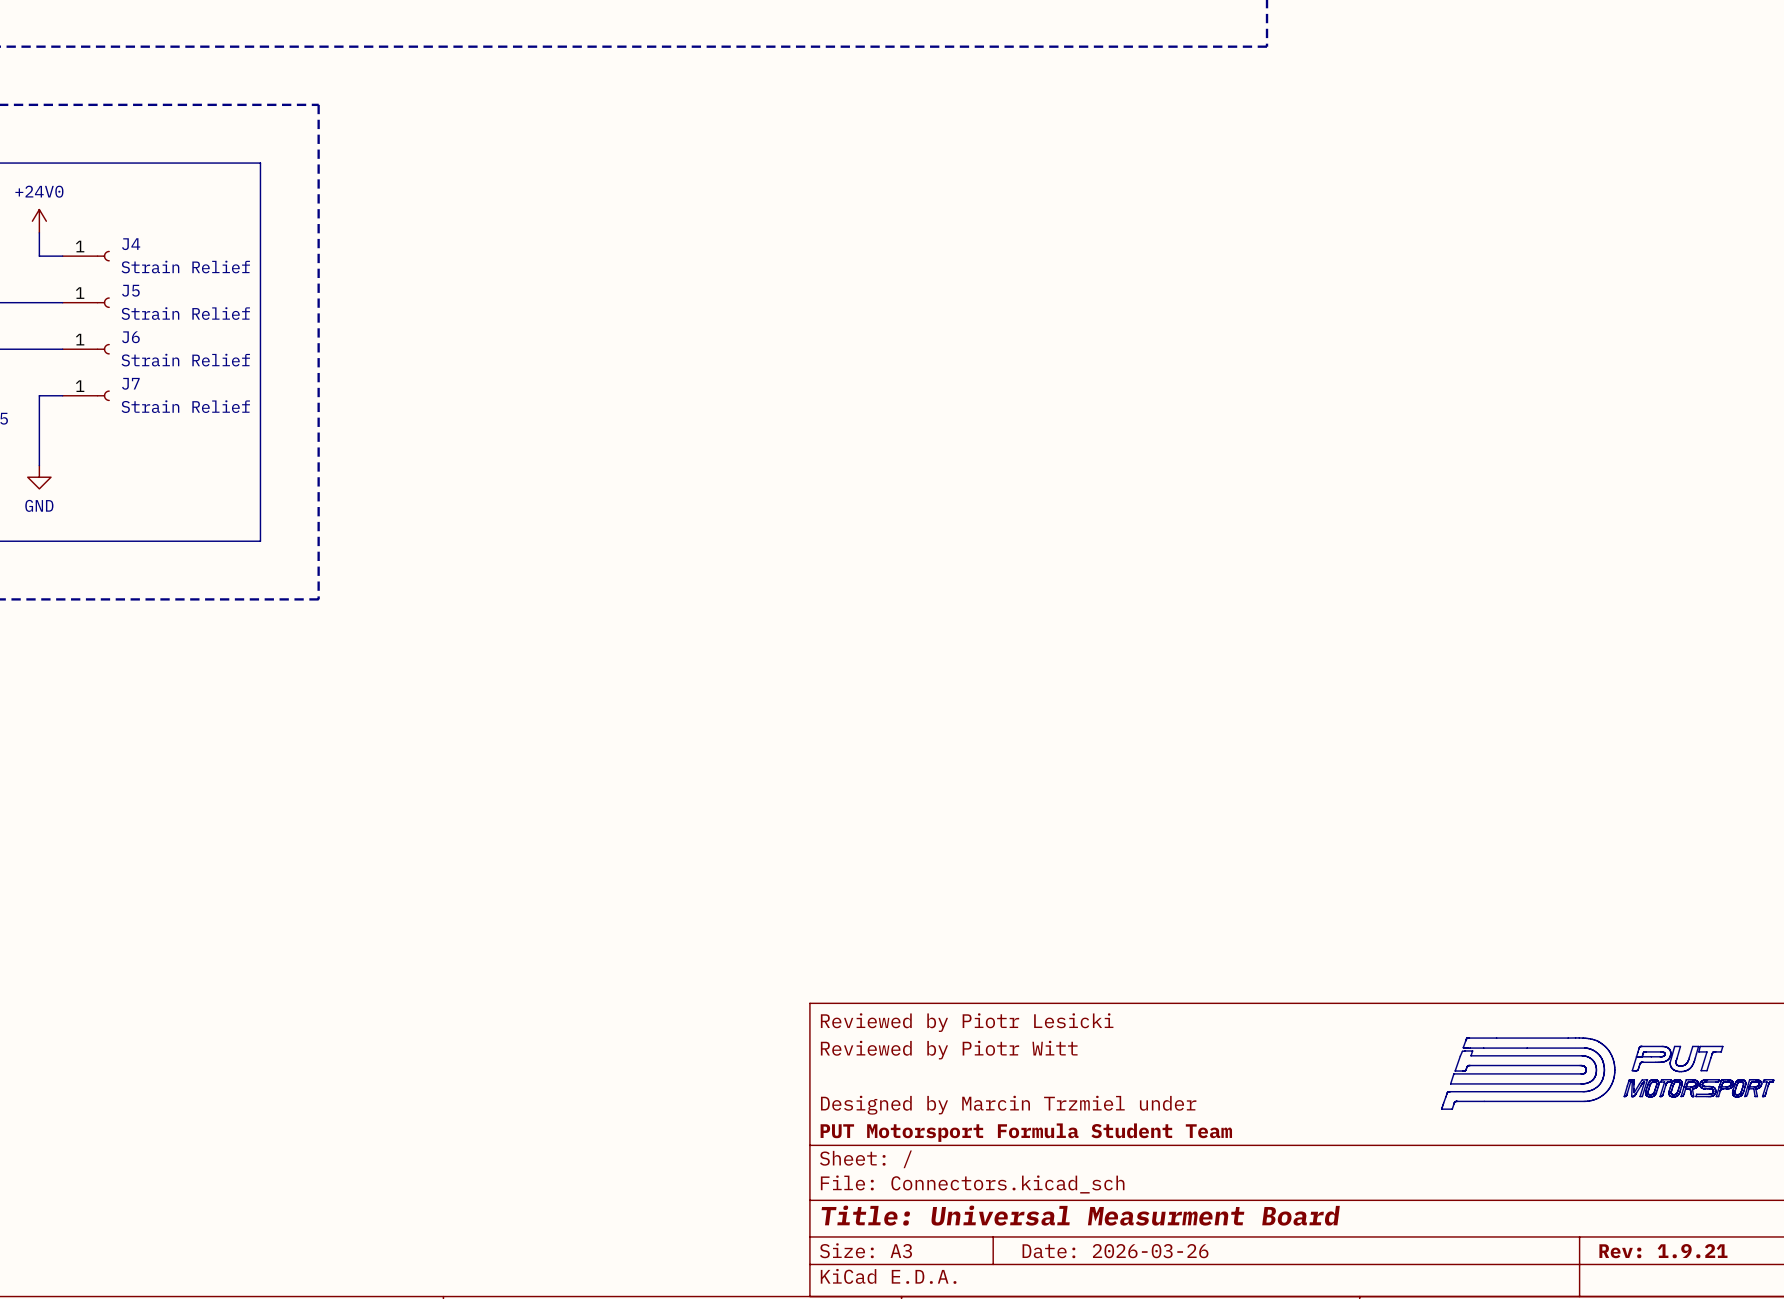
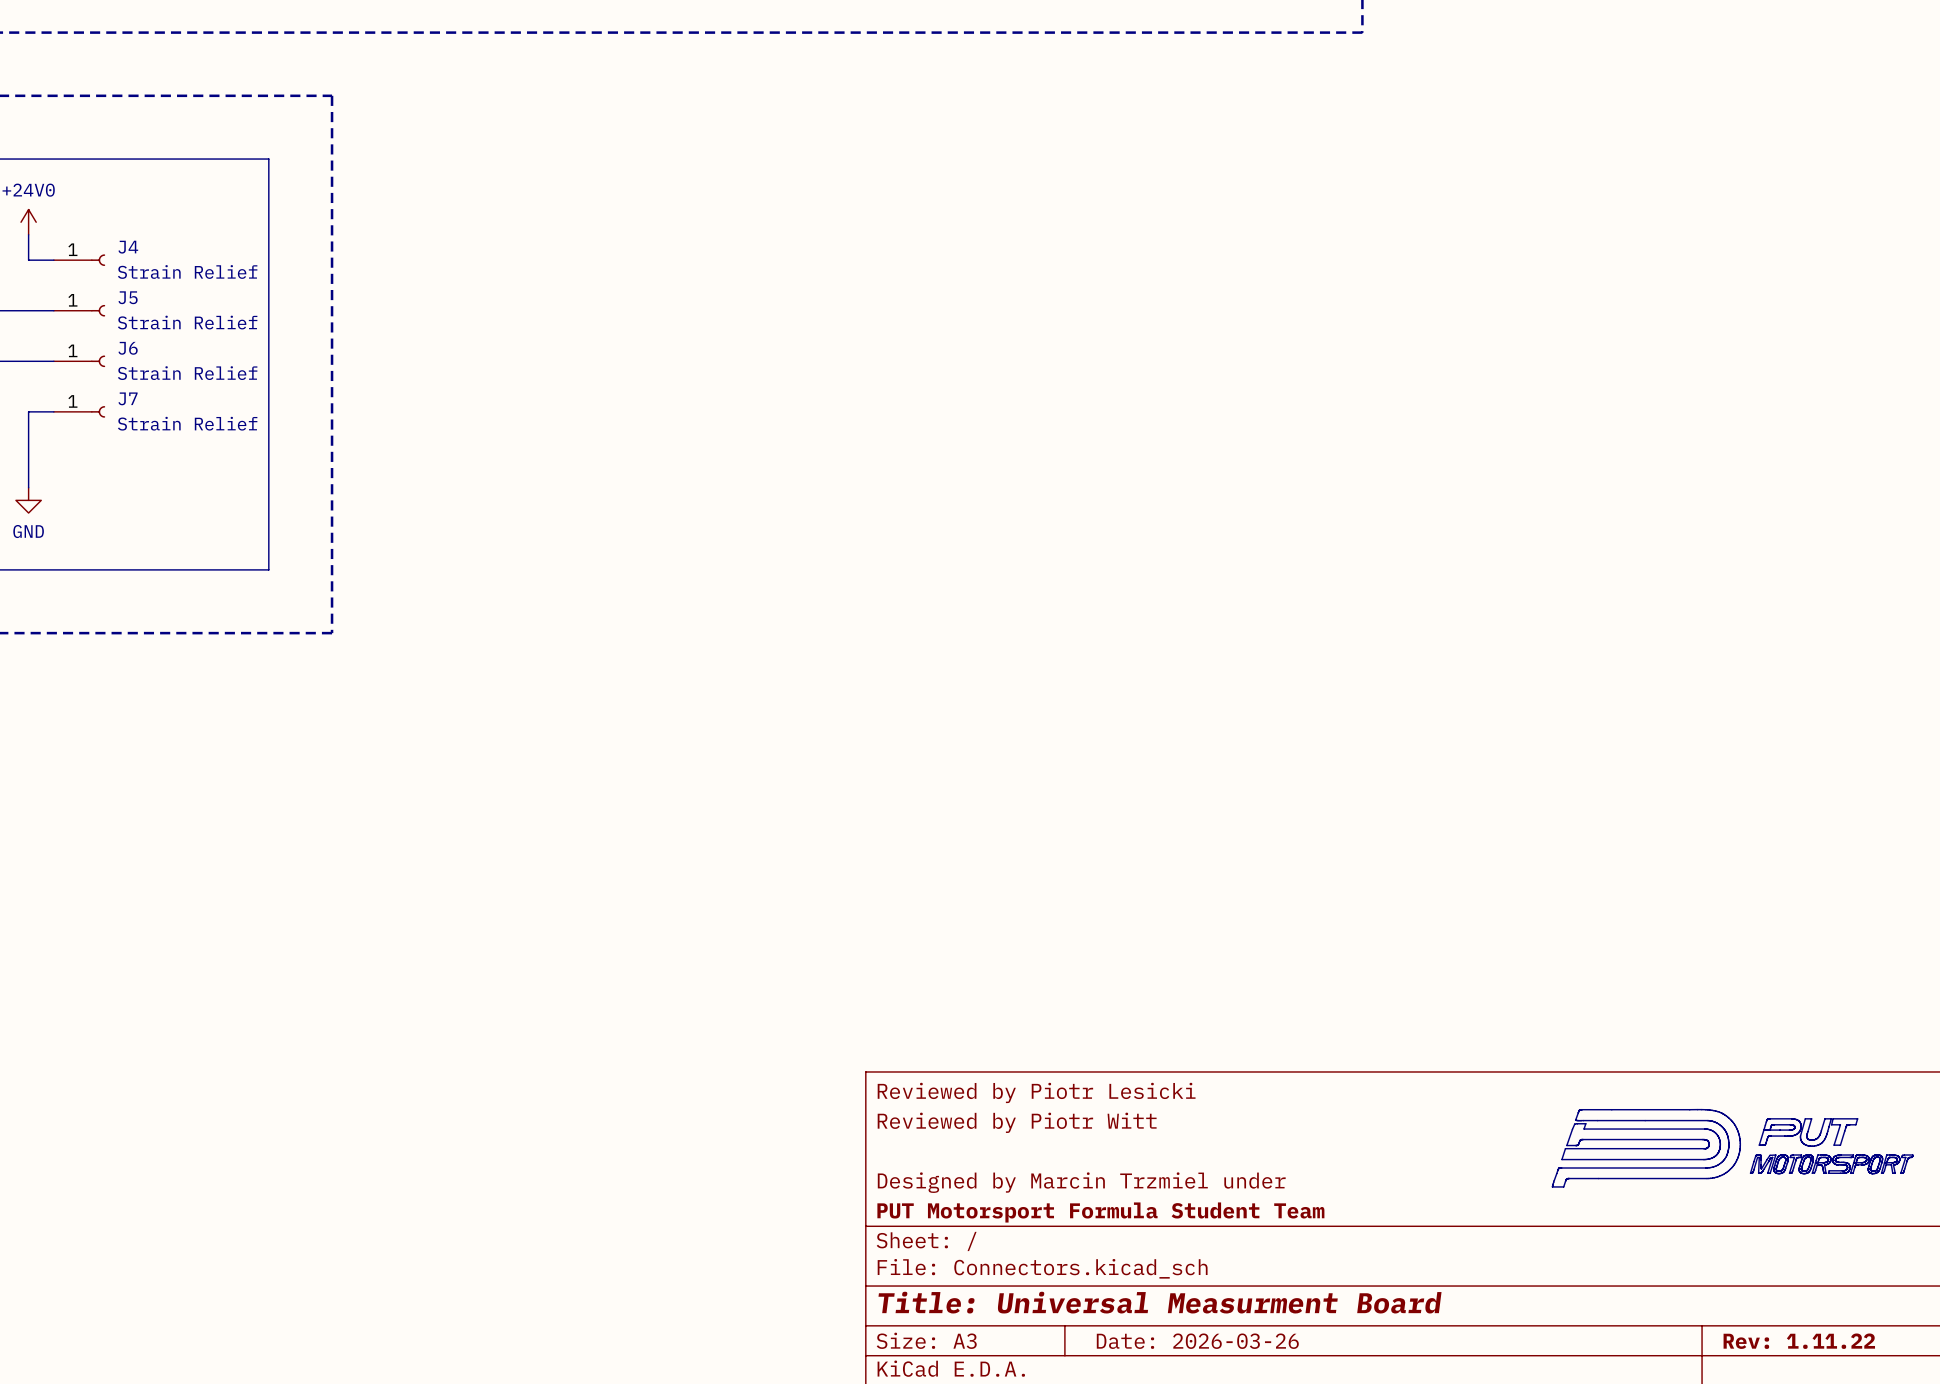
title block: Rev: 1.9.21 (1663, 1251) -> Rev: 1.11.22 (1799, 1341)

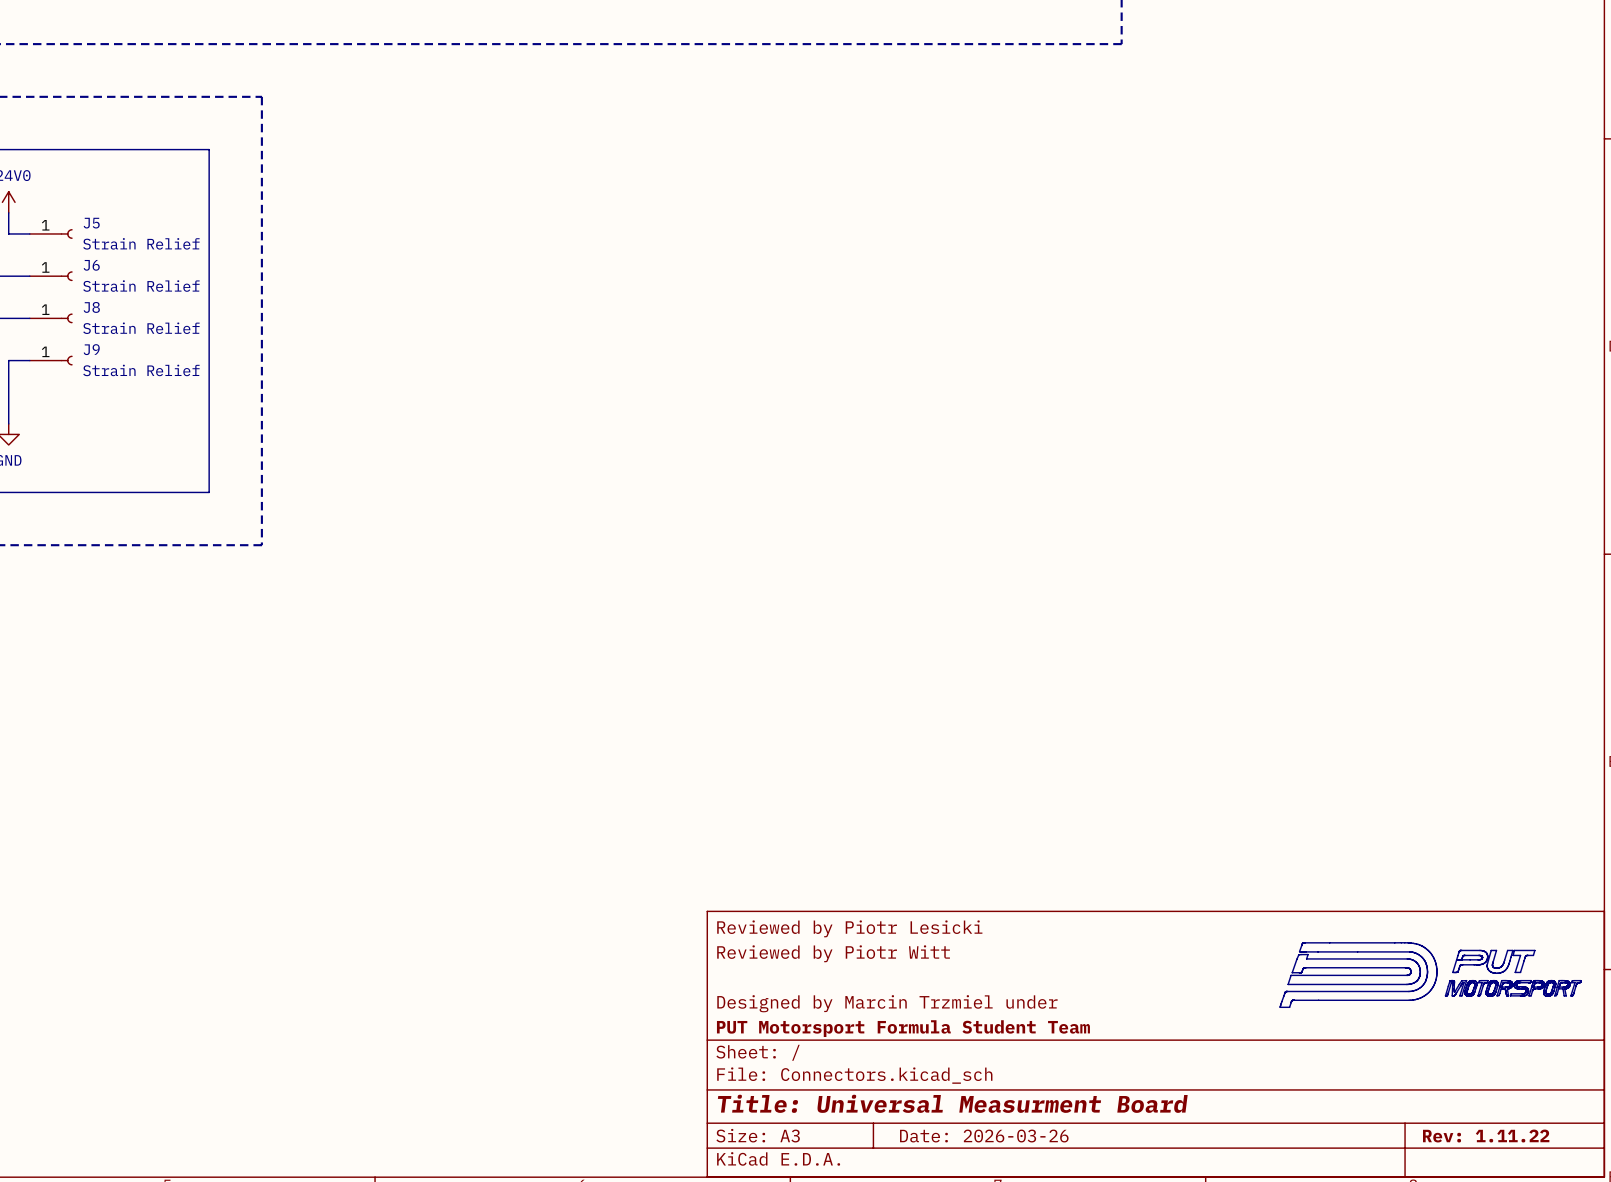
J4 name: J4 (128, 247) -> J5 (91, 223)
J5 name: J5 (128, 297) -> J6 (91, 265)
J6 name: J6 (128, 348) -> J8 (91, 307)
J7 name: J7 (128, 398) -> J9 (91, 349)

